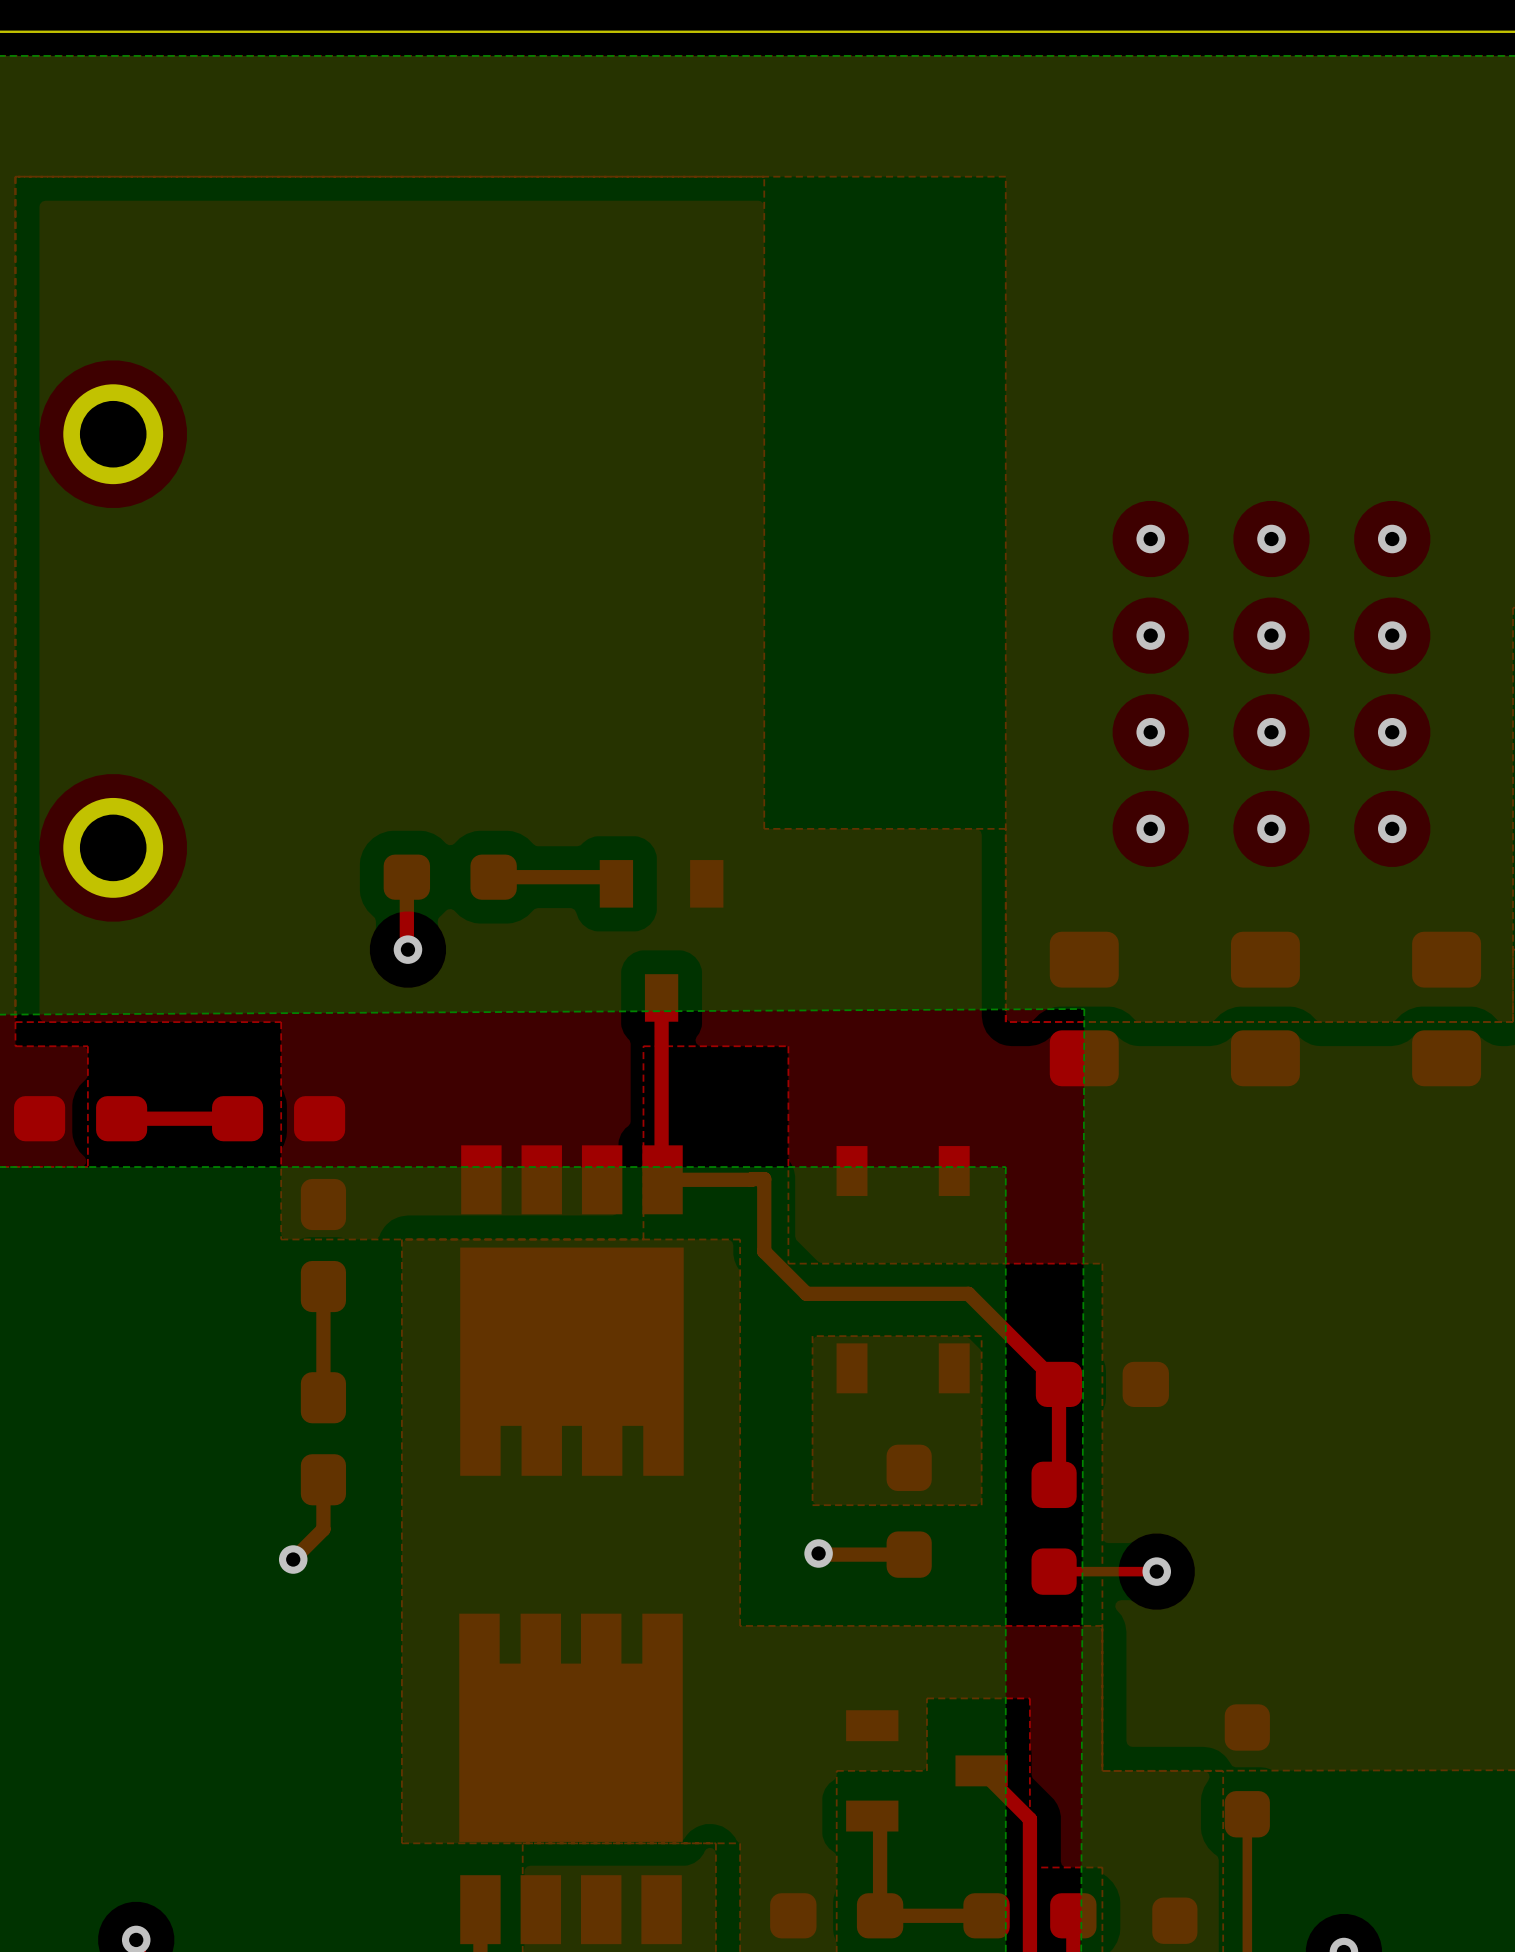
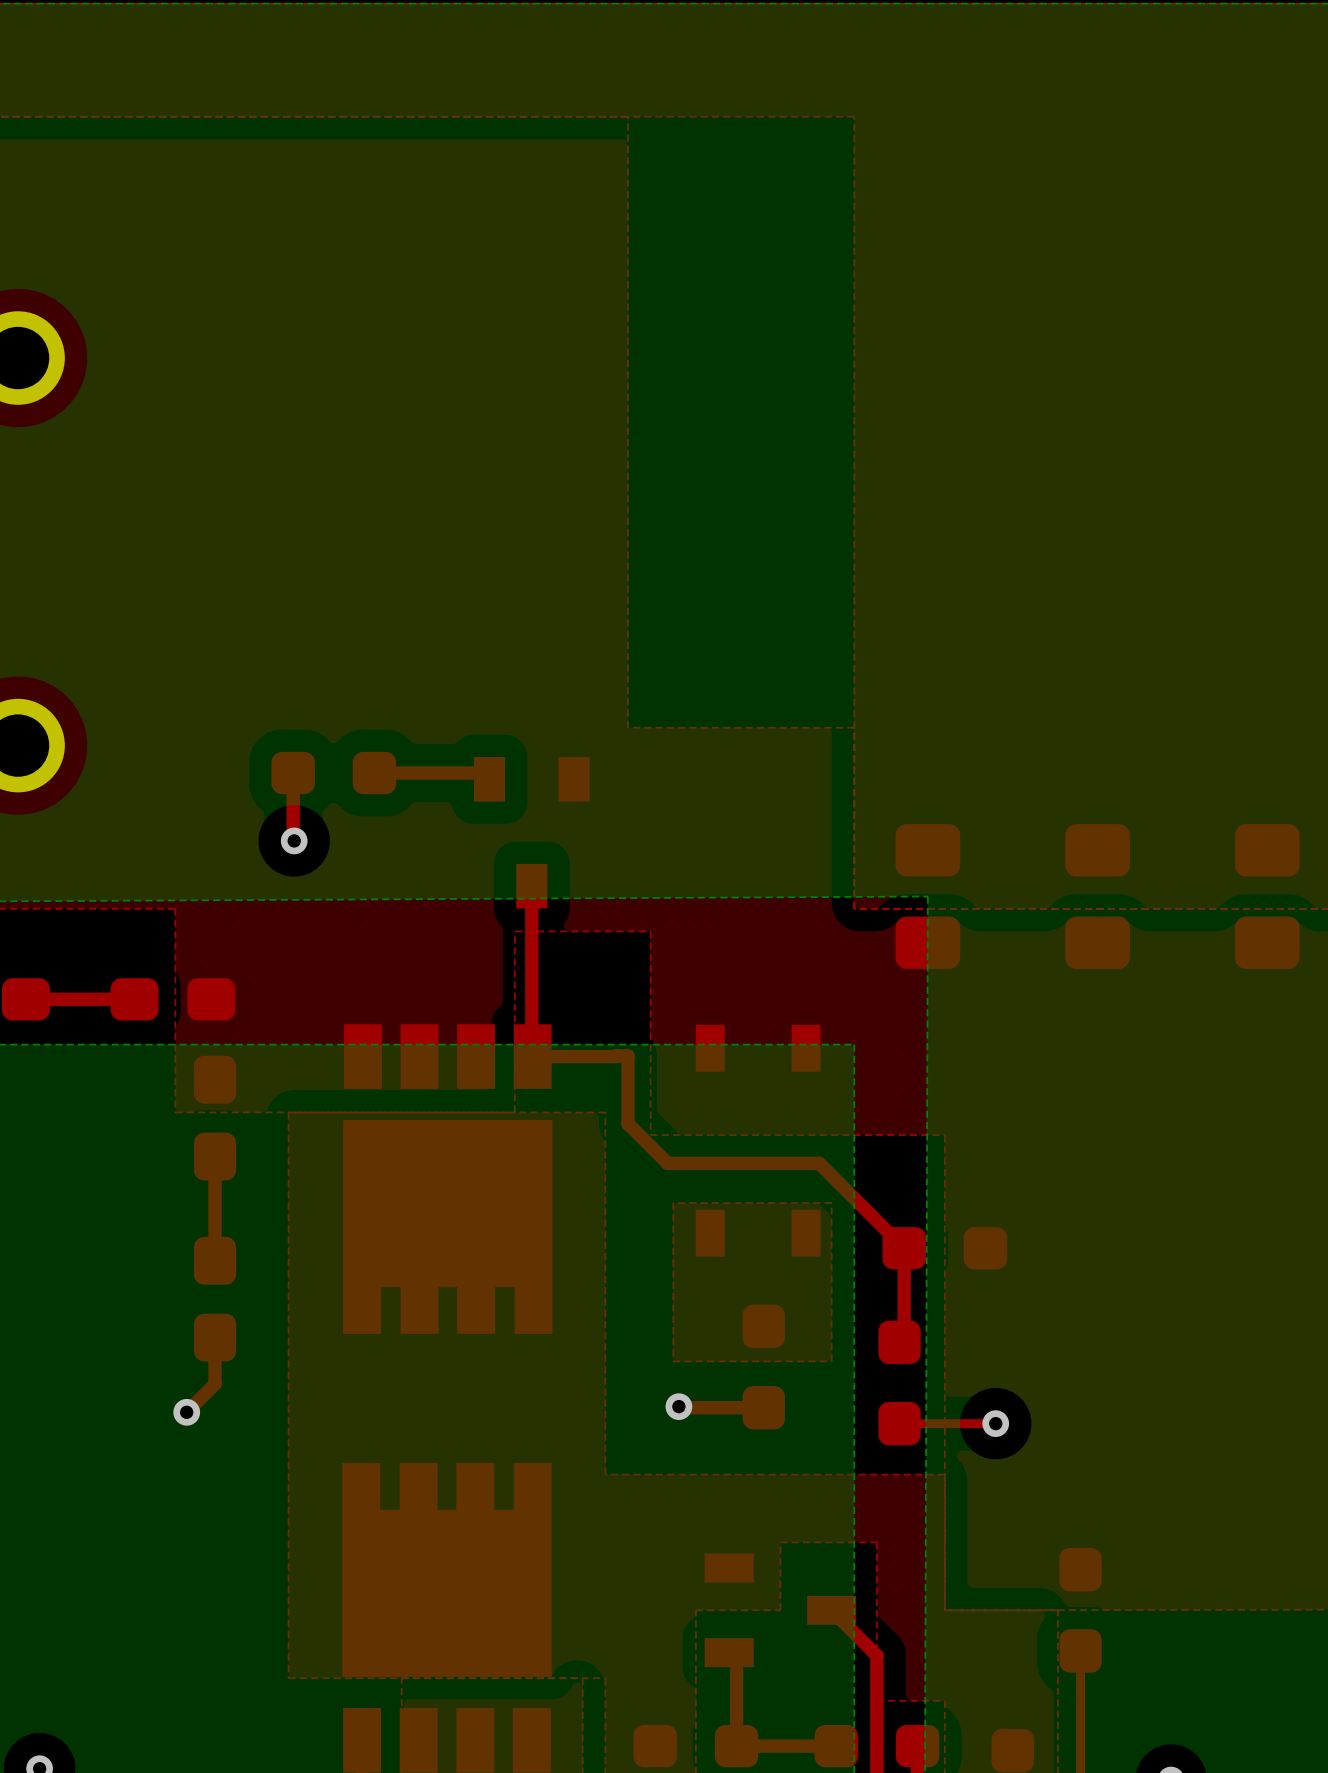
via: (1150, 539) -> none
via: (1271, 539) -> none
via: (1392, 539) -> none
via: (1150, 635) -> none
via: (1271, 635) -> none
via: (1392, 635) -> none
via: (1150, 732) -> none
via: (1271, 732) -> none
via: (1392, 732) -> none
via: (1150, 828) -> none
via: (1271, 828) -> none
via: (1392, 828) -> none

